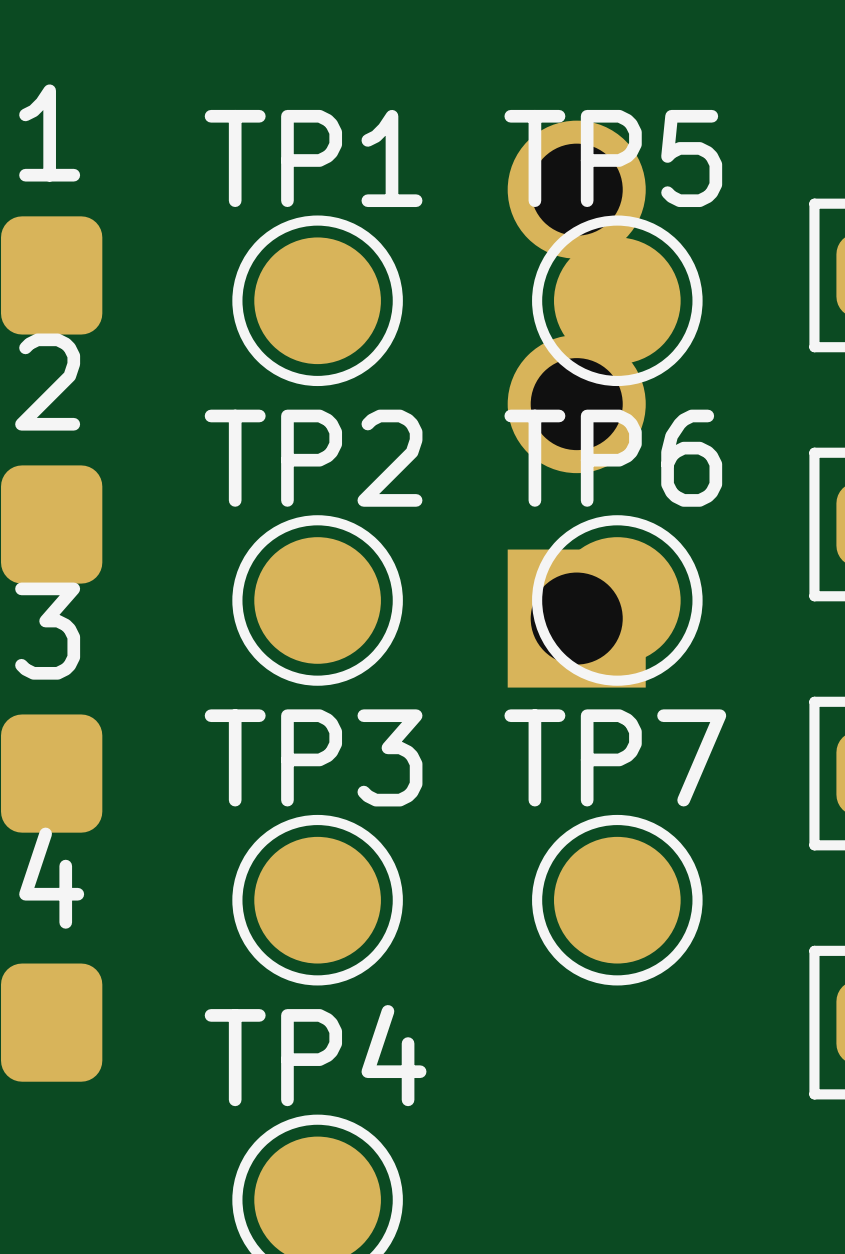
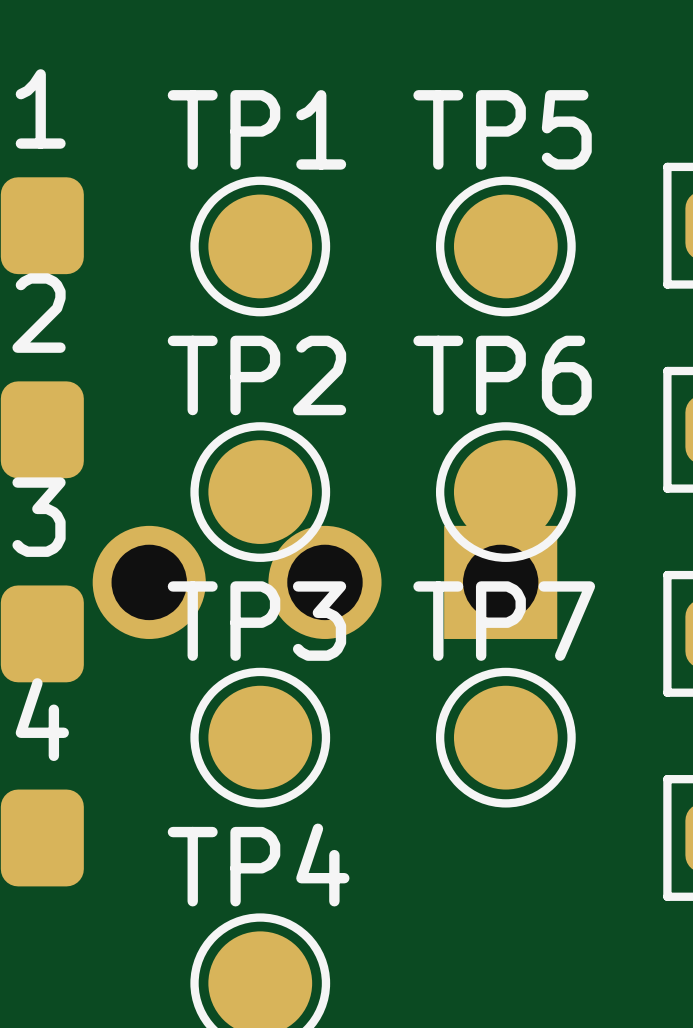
part rotation: 0° (576, 404) -> 90° counterclockwise (324, 582)
part position: (576, 404) -> (324, 582)

